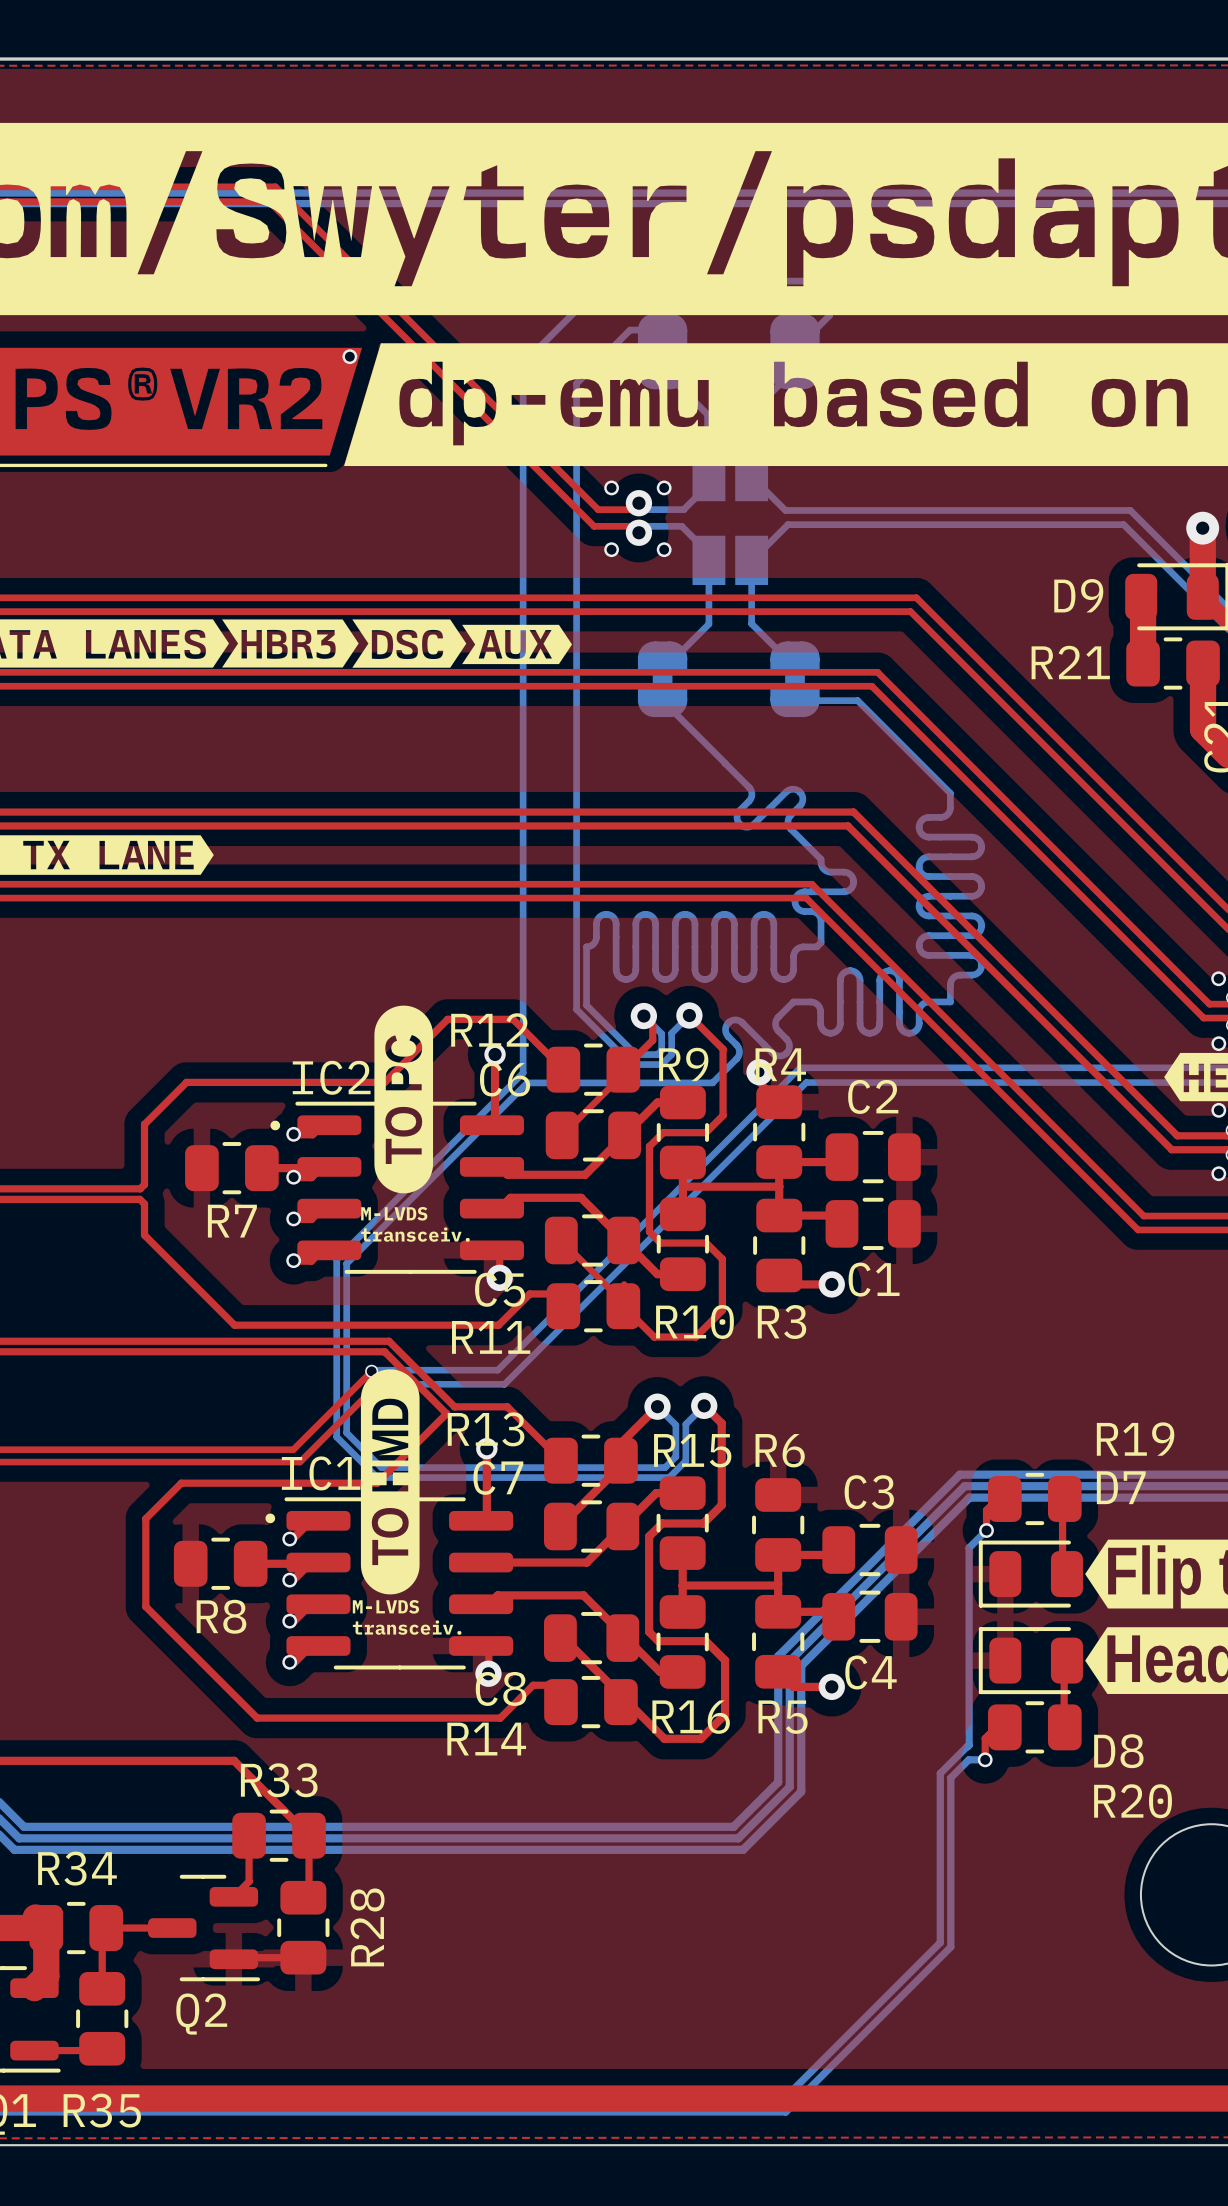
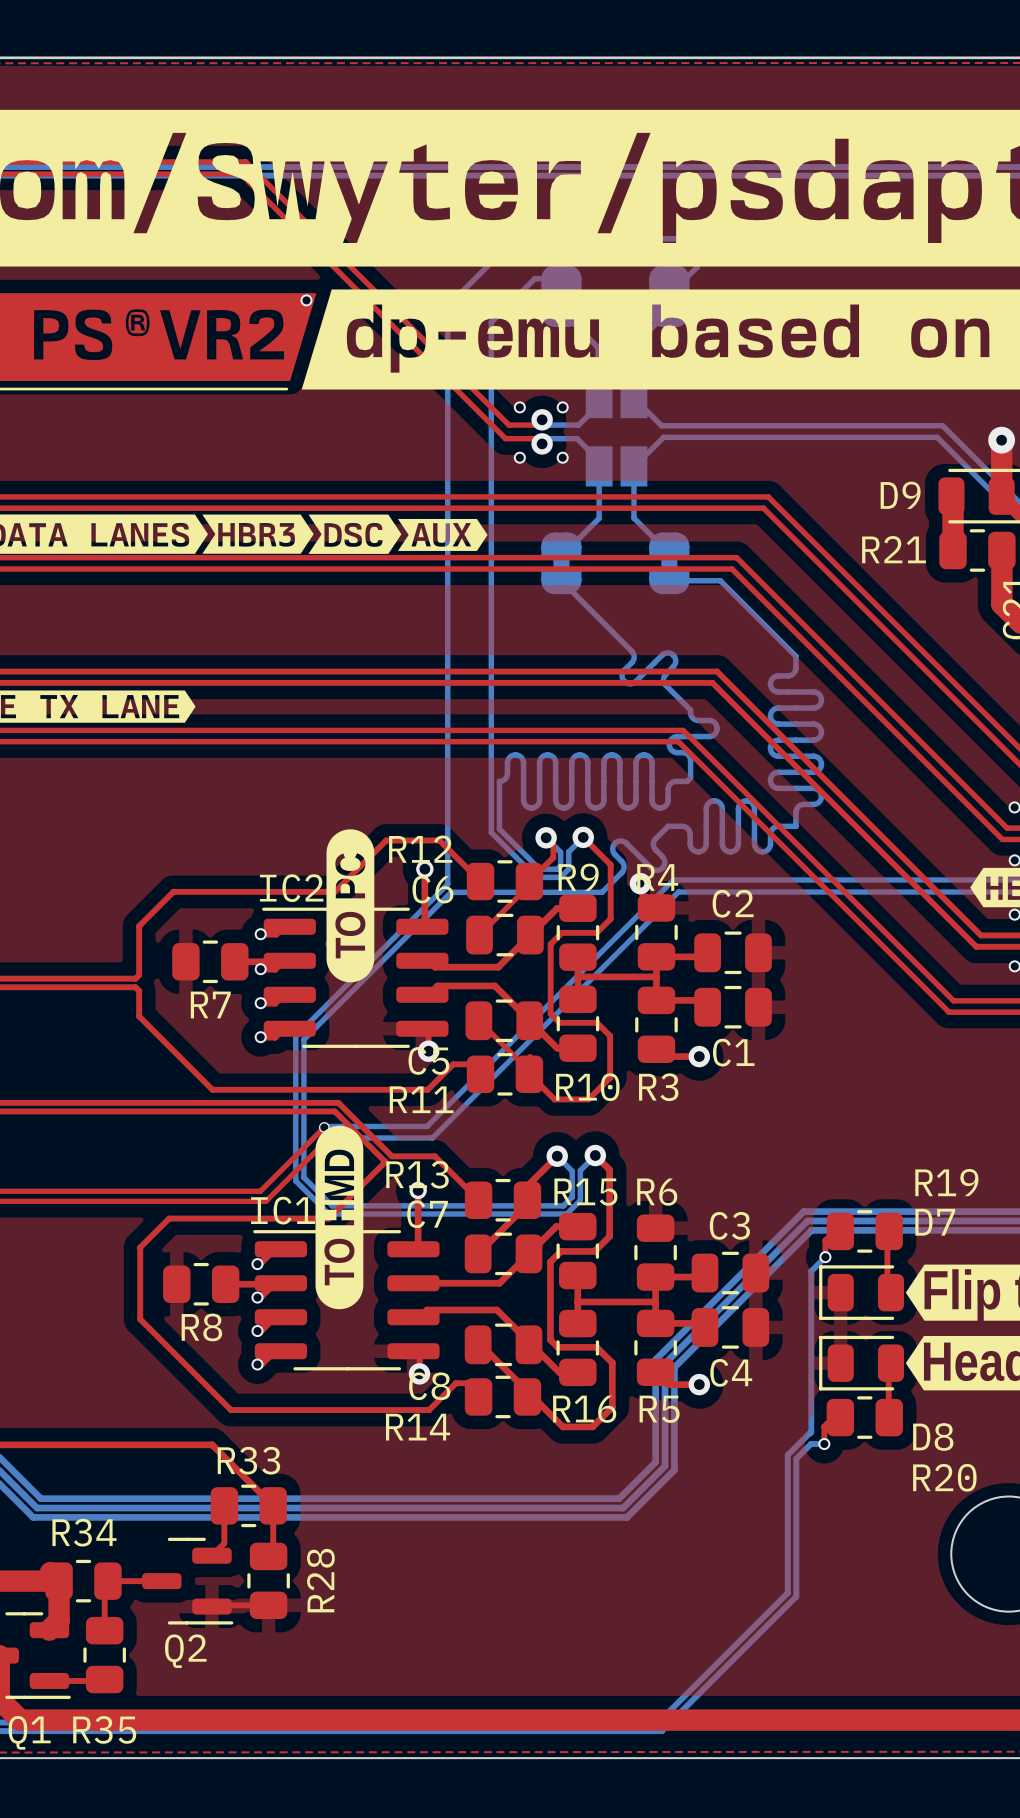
drawing: [270, 1120, 281, 1131] -> none
text: M-LVDS (394, 1213) -> none
text: transceiv. (415, 1234) -> none
drawing: [265, 1513, 276, 1524] -> none
text: M-LVDS (385, 1606) -> none
text: transceiv. (407, 1627) -> none

